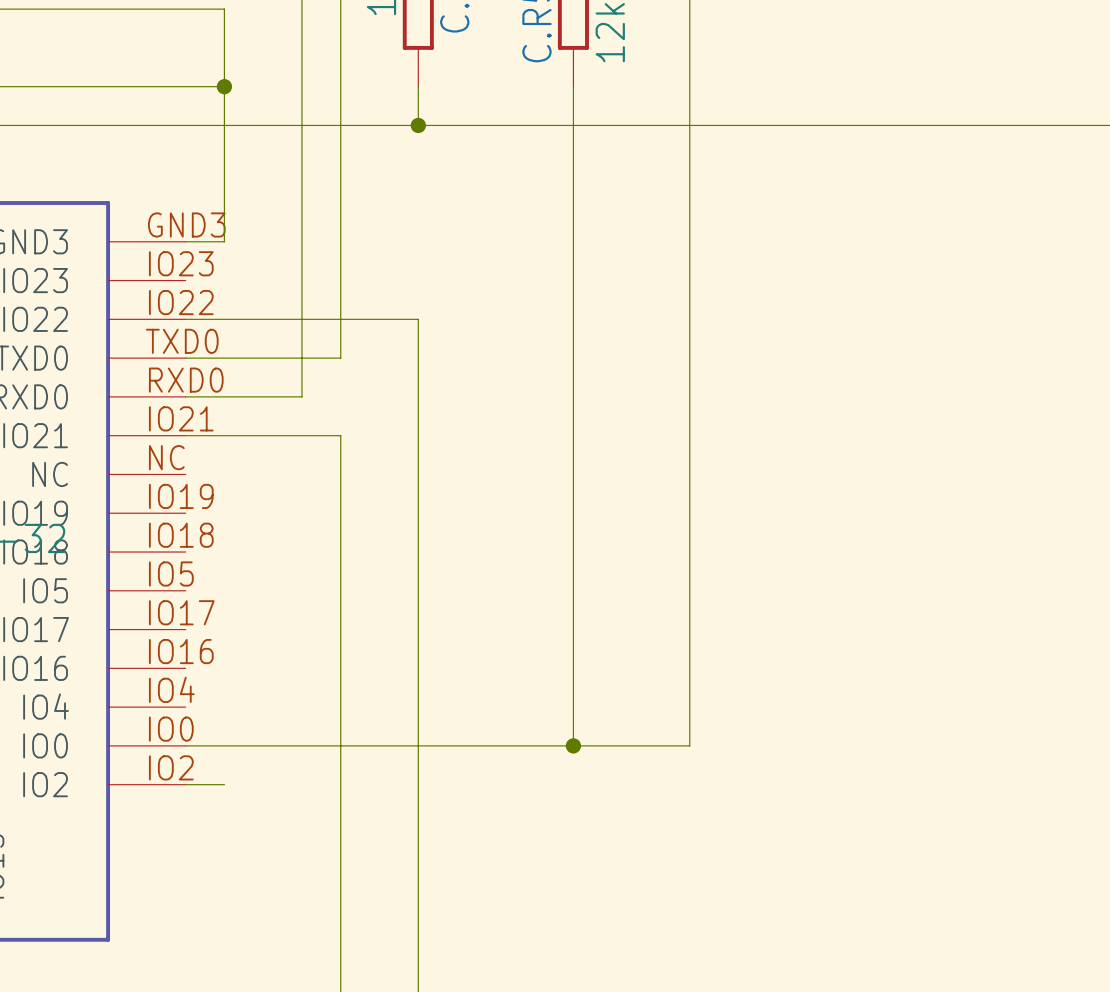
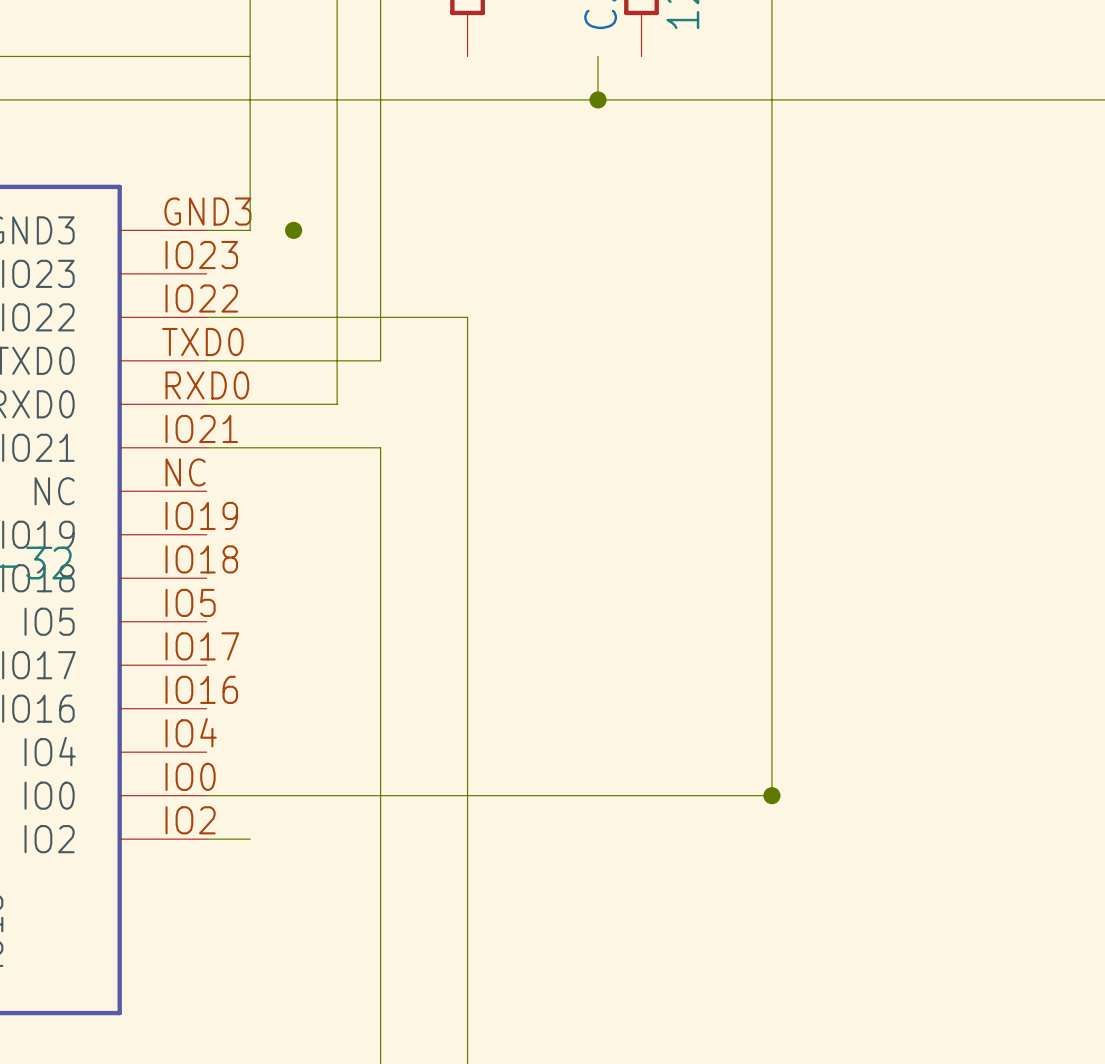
junction: (224, 86) -> none
wire: (418, 86) (418, 125) -> (598, 56) (598, 99)
wire: (573, 86) (573, 745) -> none
junction: (418, 125) -> none
junction: none -> (598, 99)
junction: none -> (293, 230)
junction: (573, 745) -> none
junction: none -> (771, 795)

